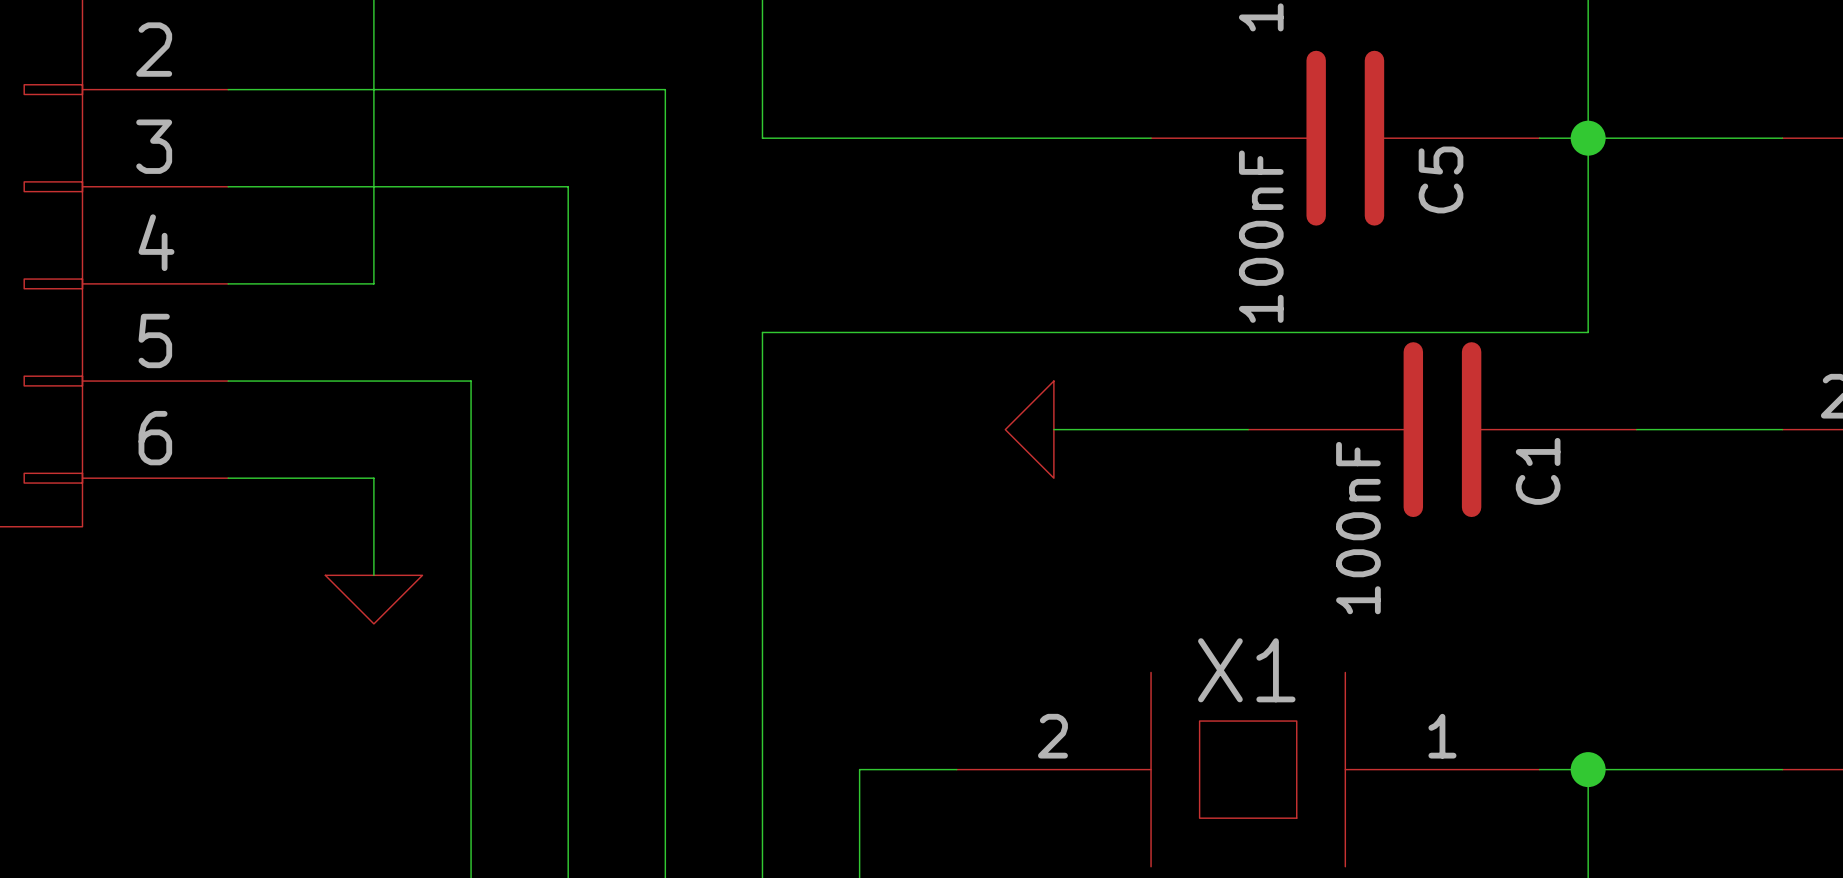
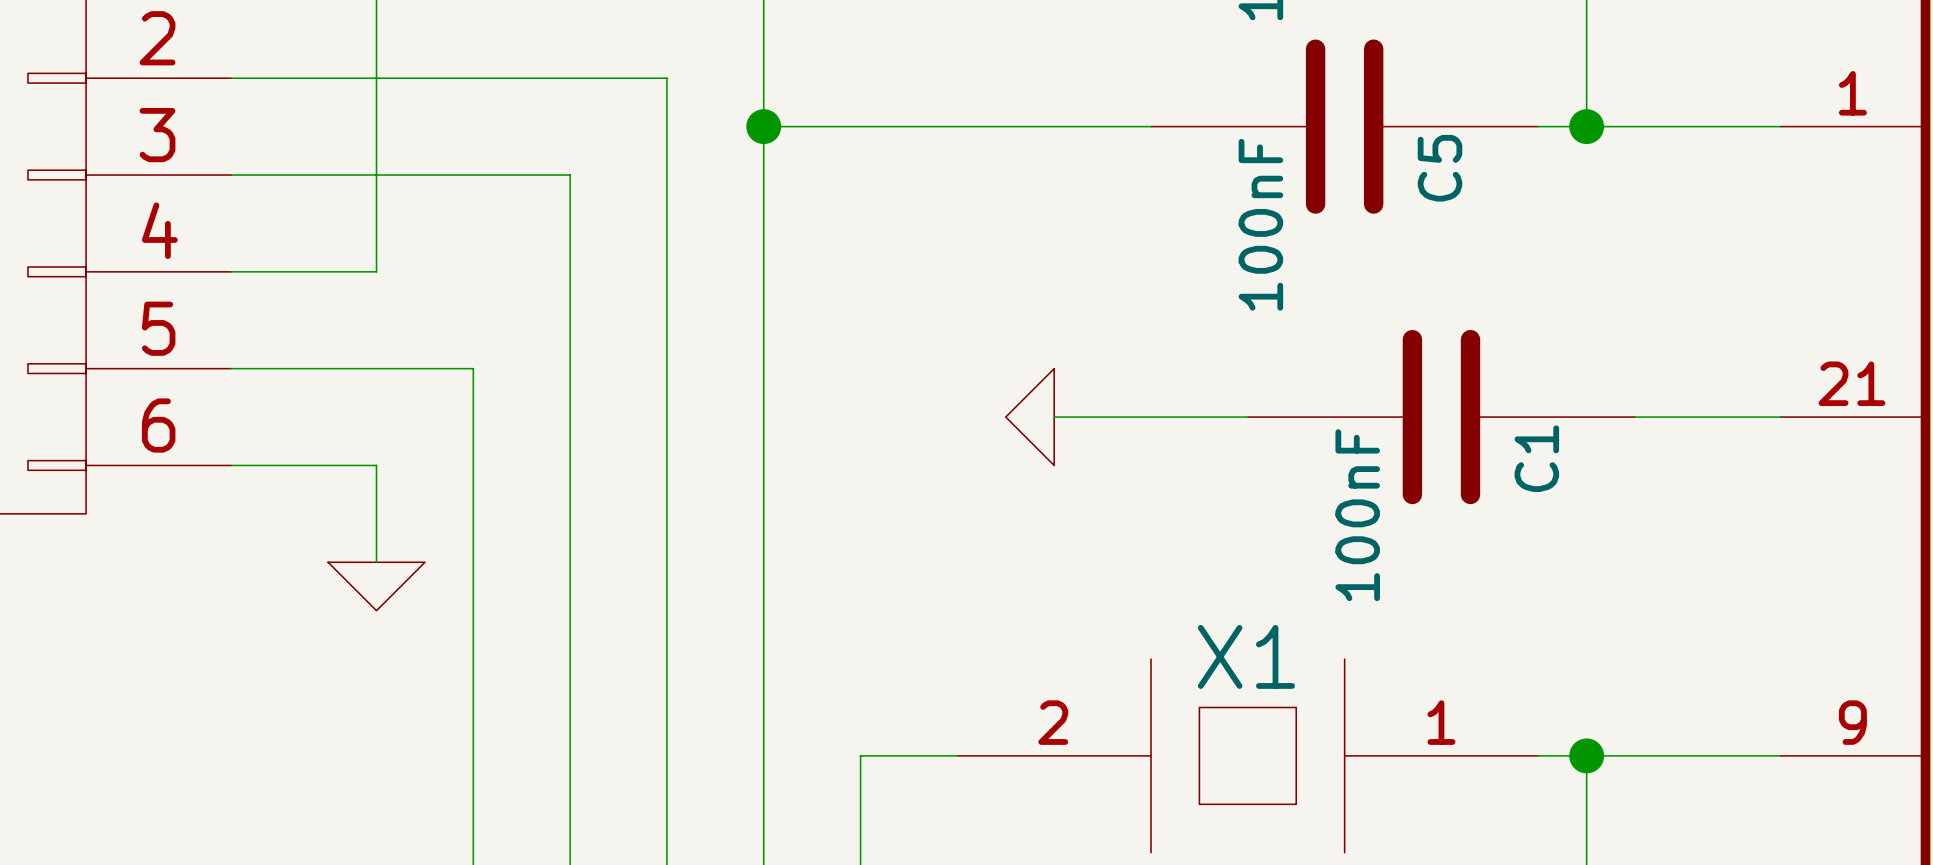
junction: none -> (763, 126)
wire: (1588, 138) (1588, 332) (762, 332) -> (763, 126) (763, 320)

